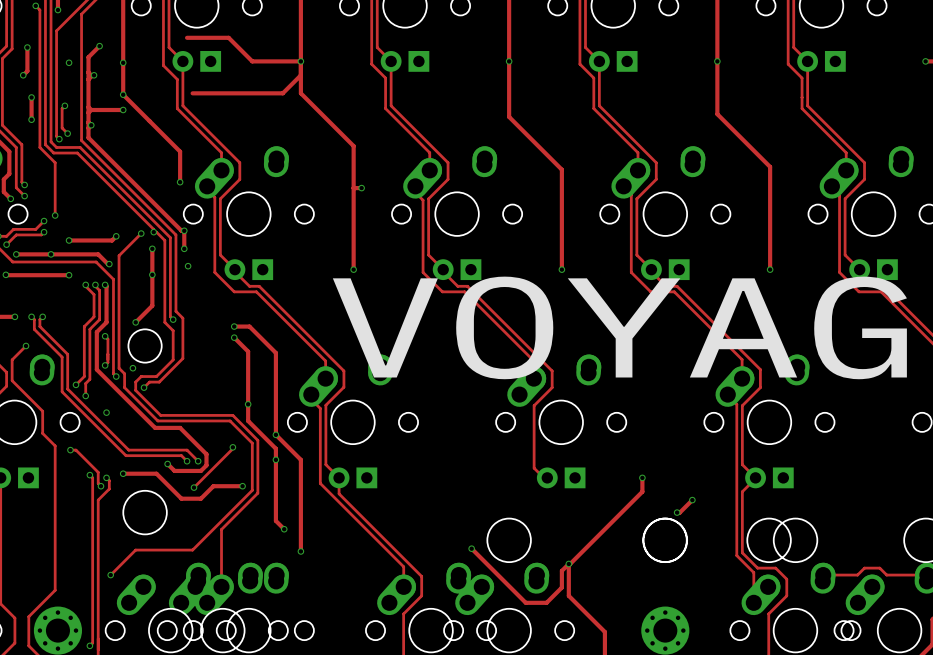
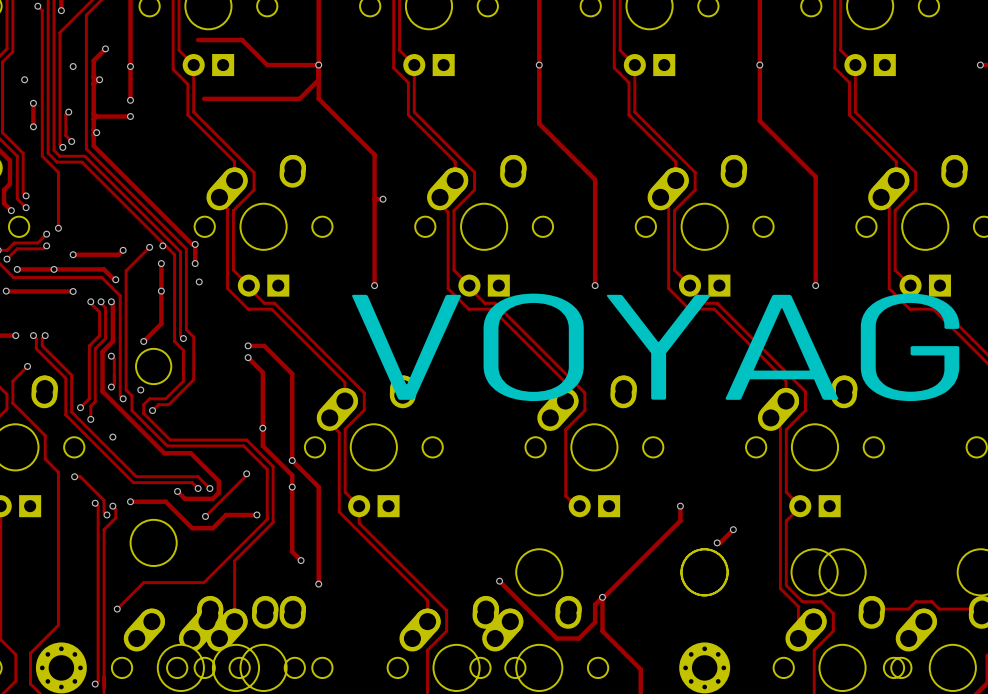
track: (27, 47) (27, 71) (23, 75) -> none
via: (27, 47) -> none
track: (123, 94) (180, 151) (180, 182) -> none
via: (180, 182) -> none

